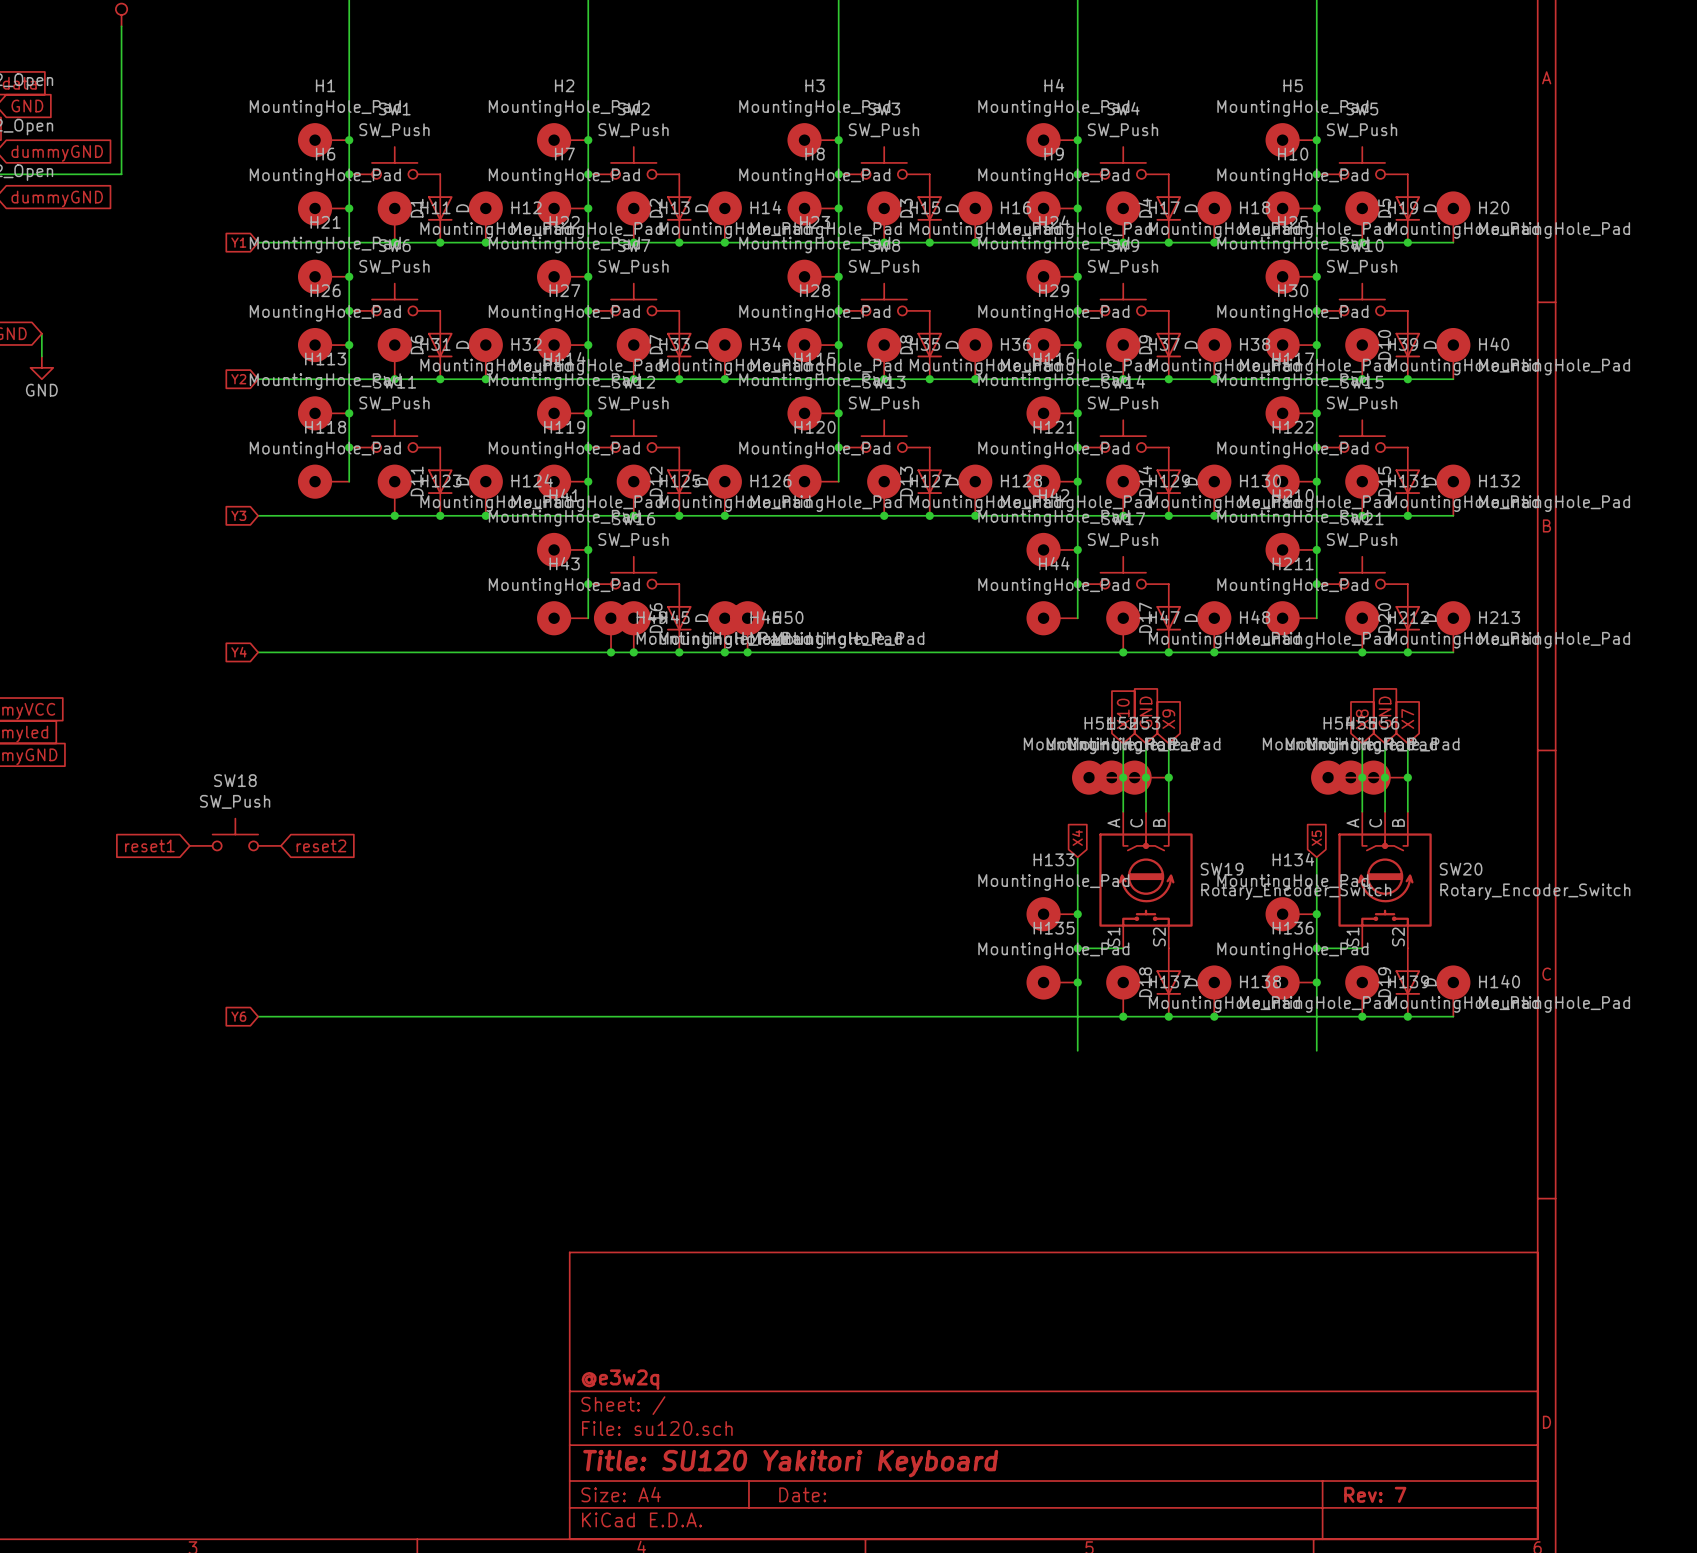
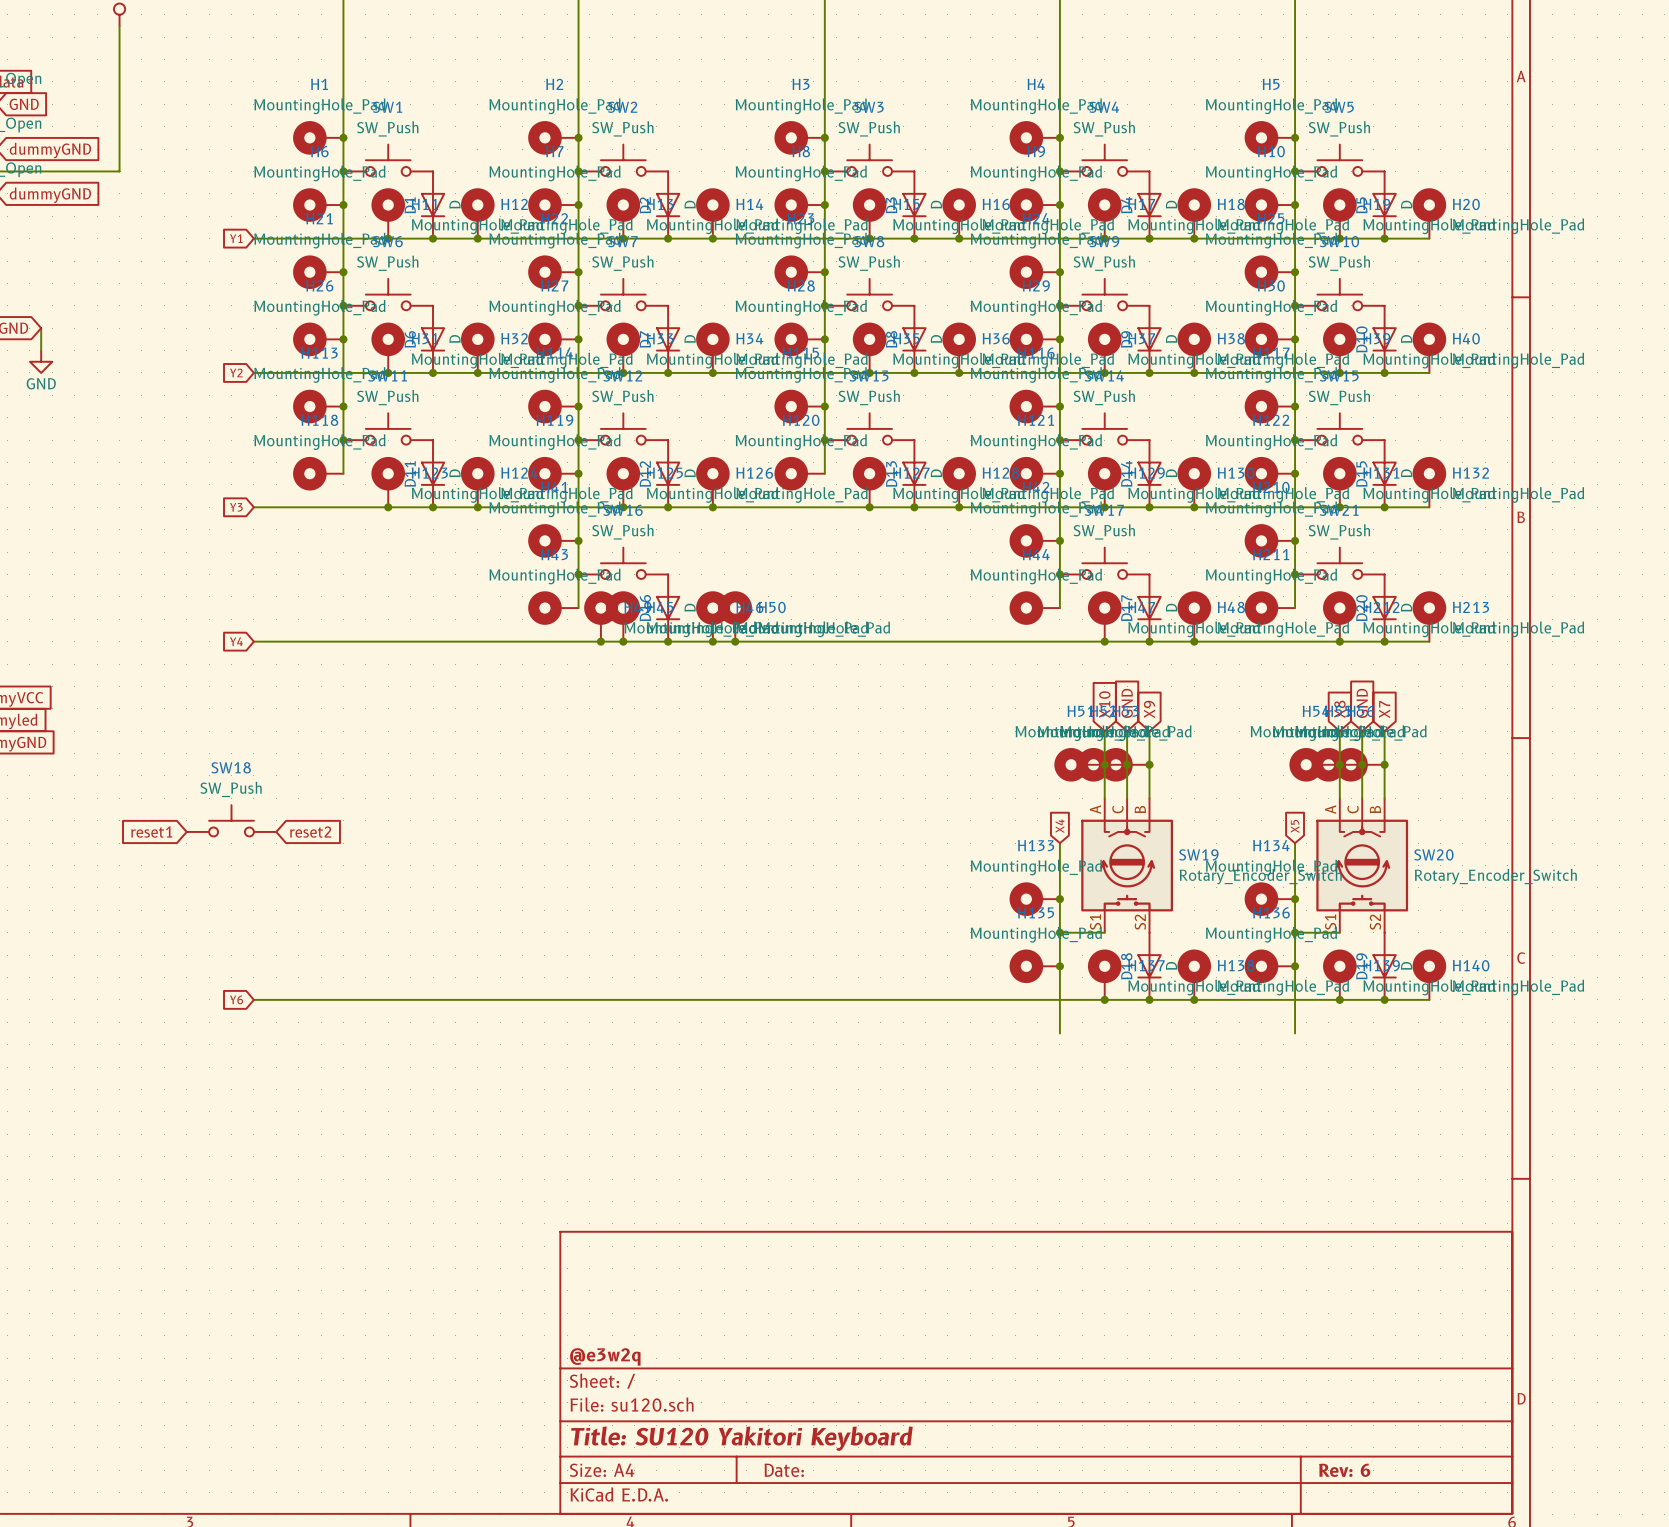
title block: Rev: 7 (1375, 1494) -> Rev: 6 (1344, 1470)

